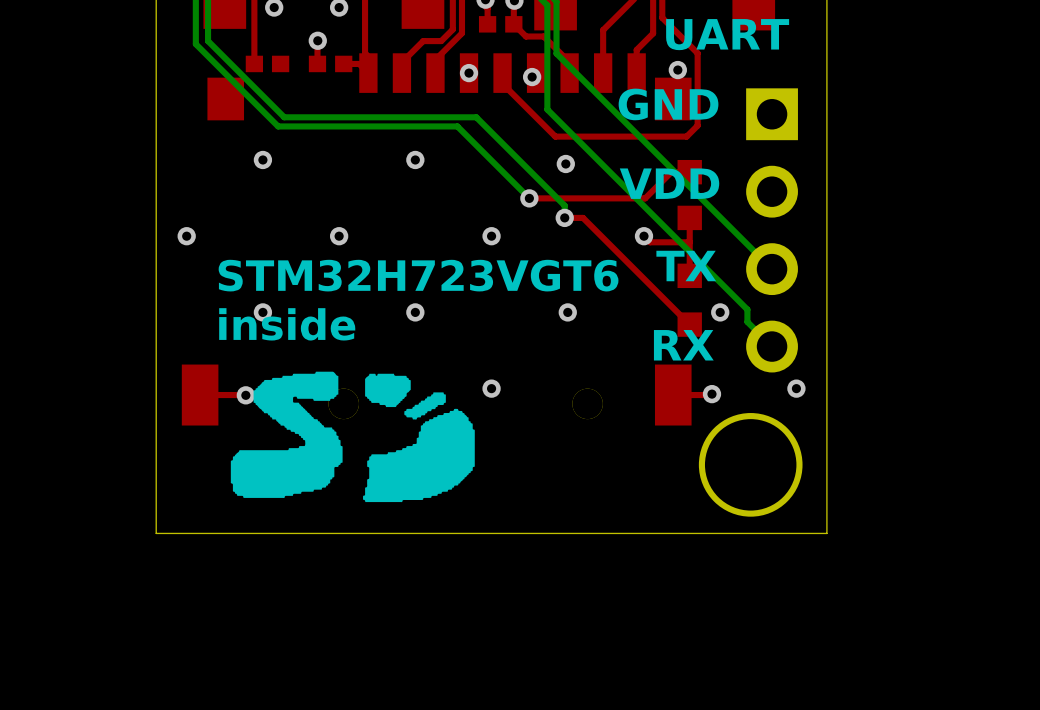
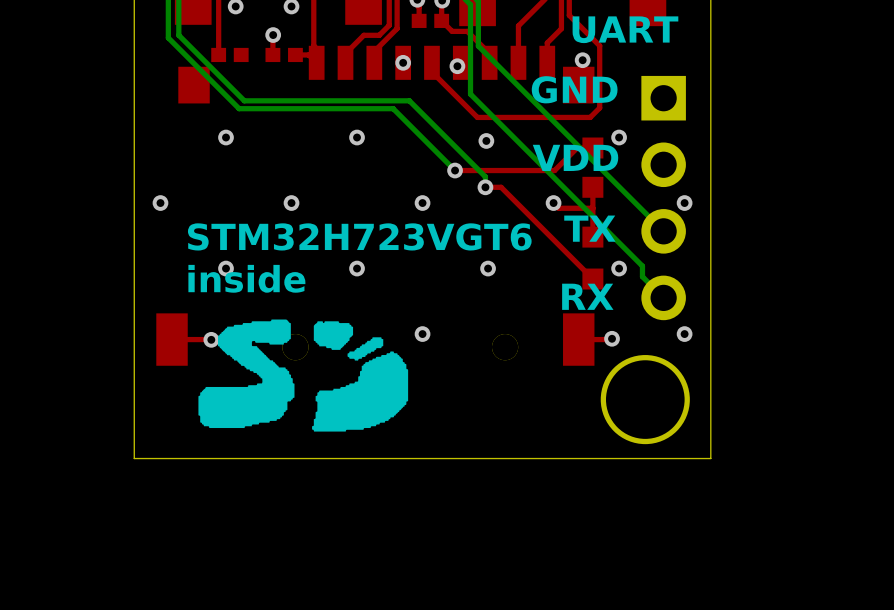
via: none -> (619, 137)
via: none -> (684, 203)

